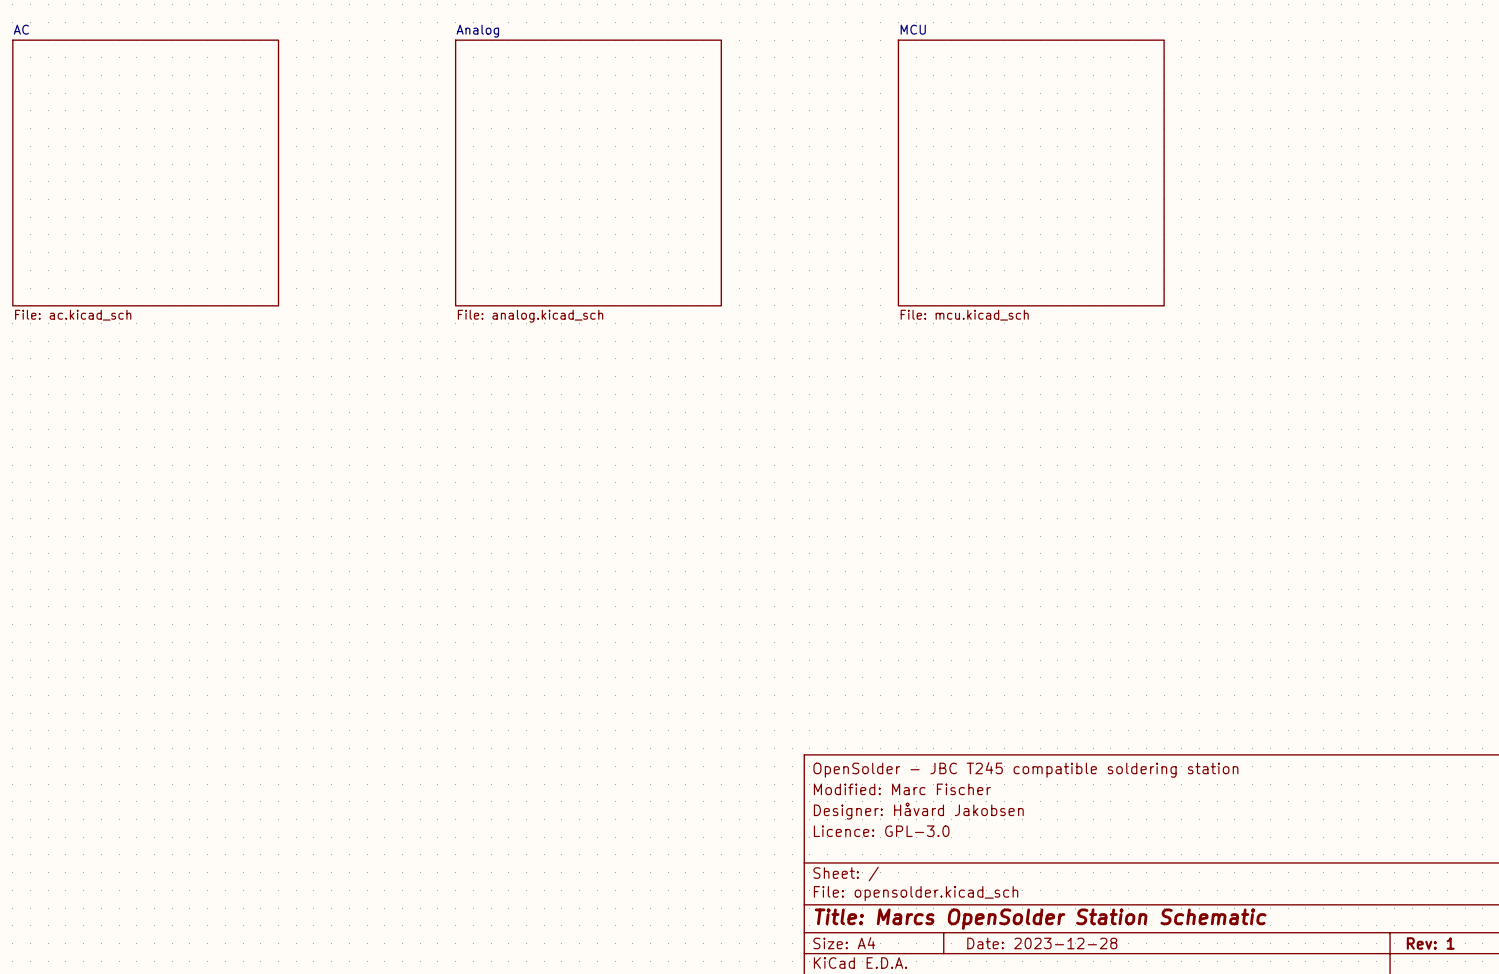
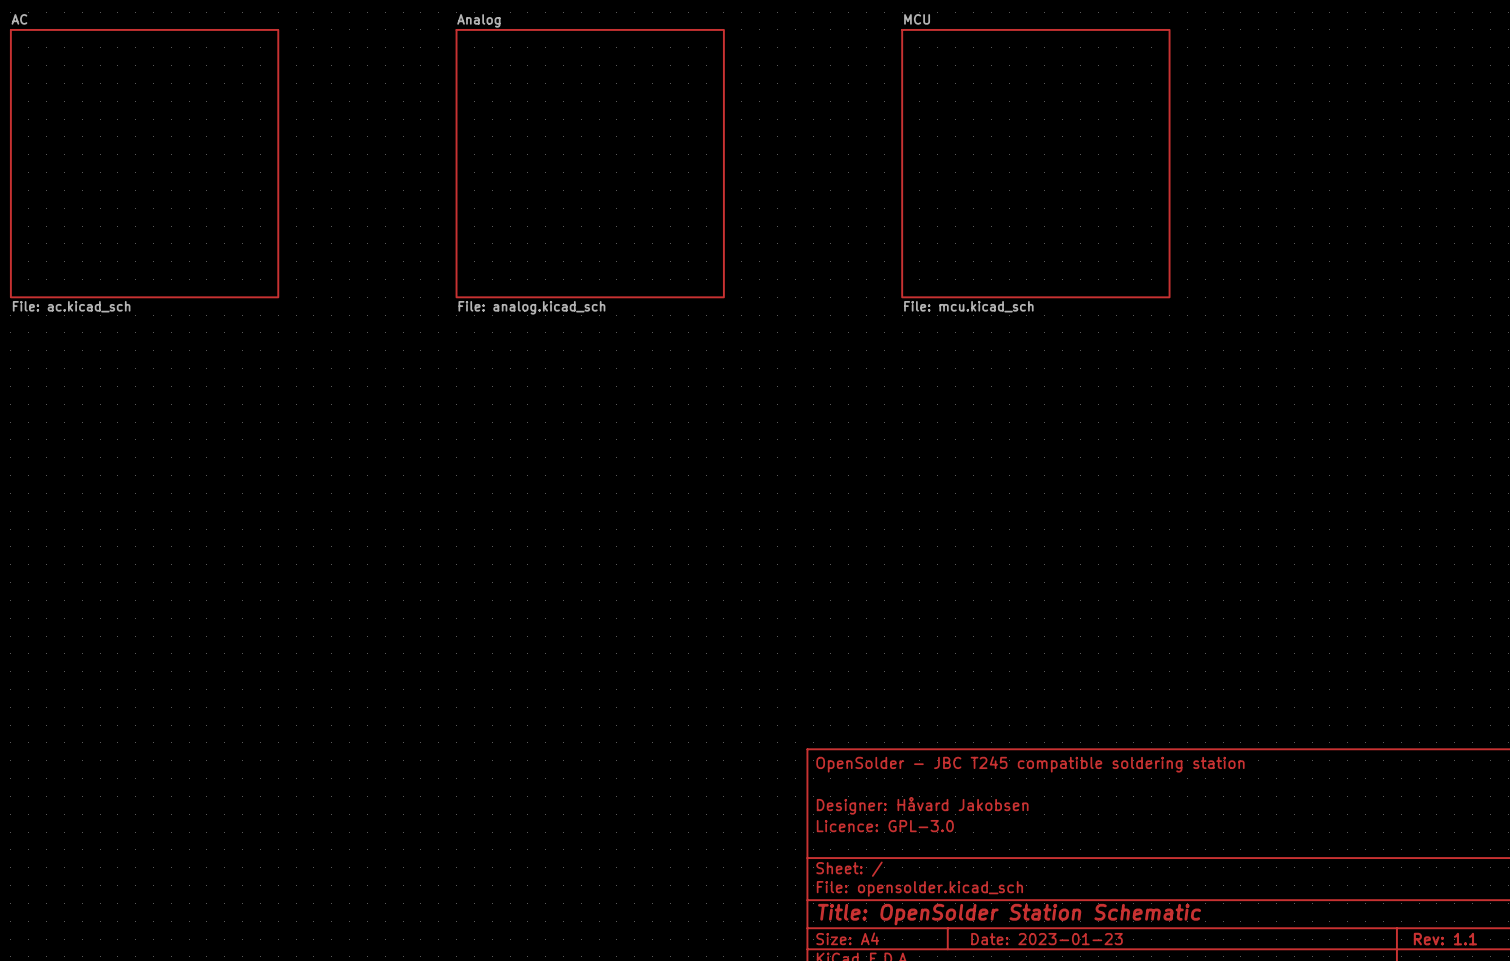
title block: Modified: Marc Fischer (902, 789) -> none
title block: Title: Marcs OpenSolder Station Schematic (1040, 919) -> Title: OpenSolder Station Schematic (1009, 914)
title block: Date: 2023-12-28 (1042, 943) -> Date: 2023-01-23 (1046, 939)
title block: Rev: 1 (1430, 943) -> Rev: 1.1 (1445, 939)

